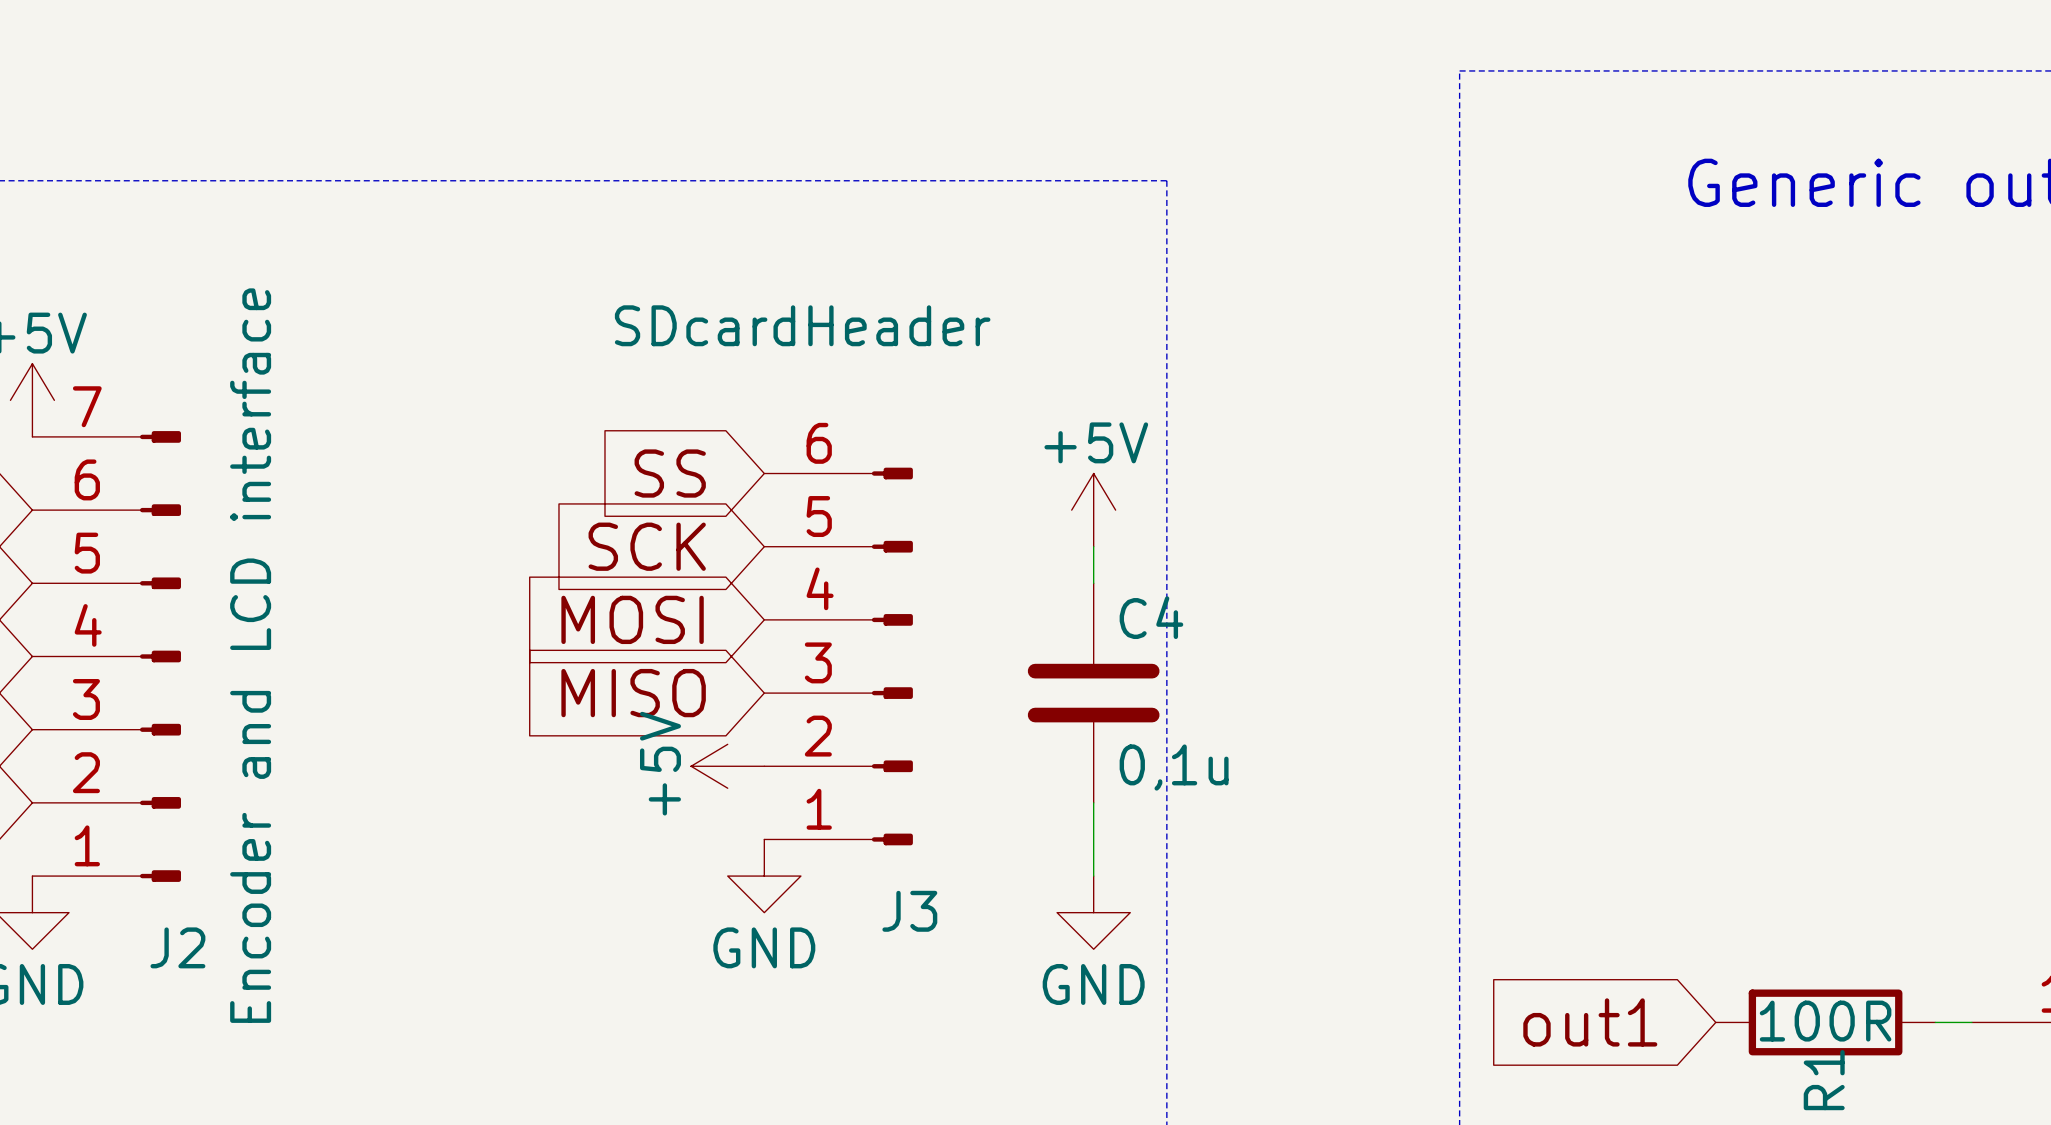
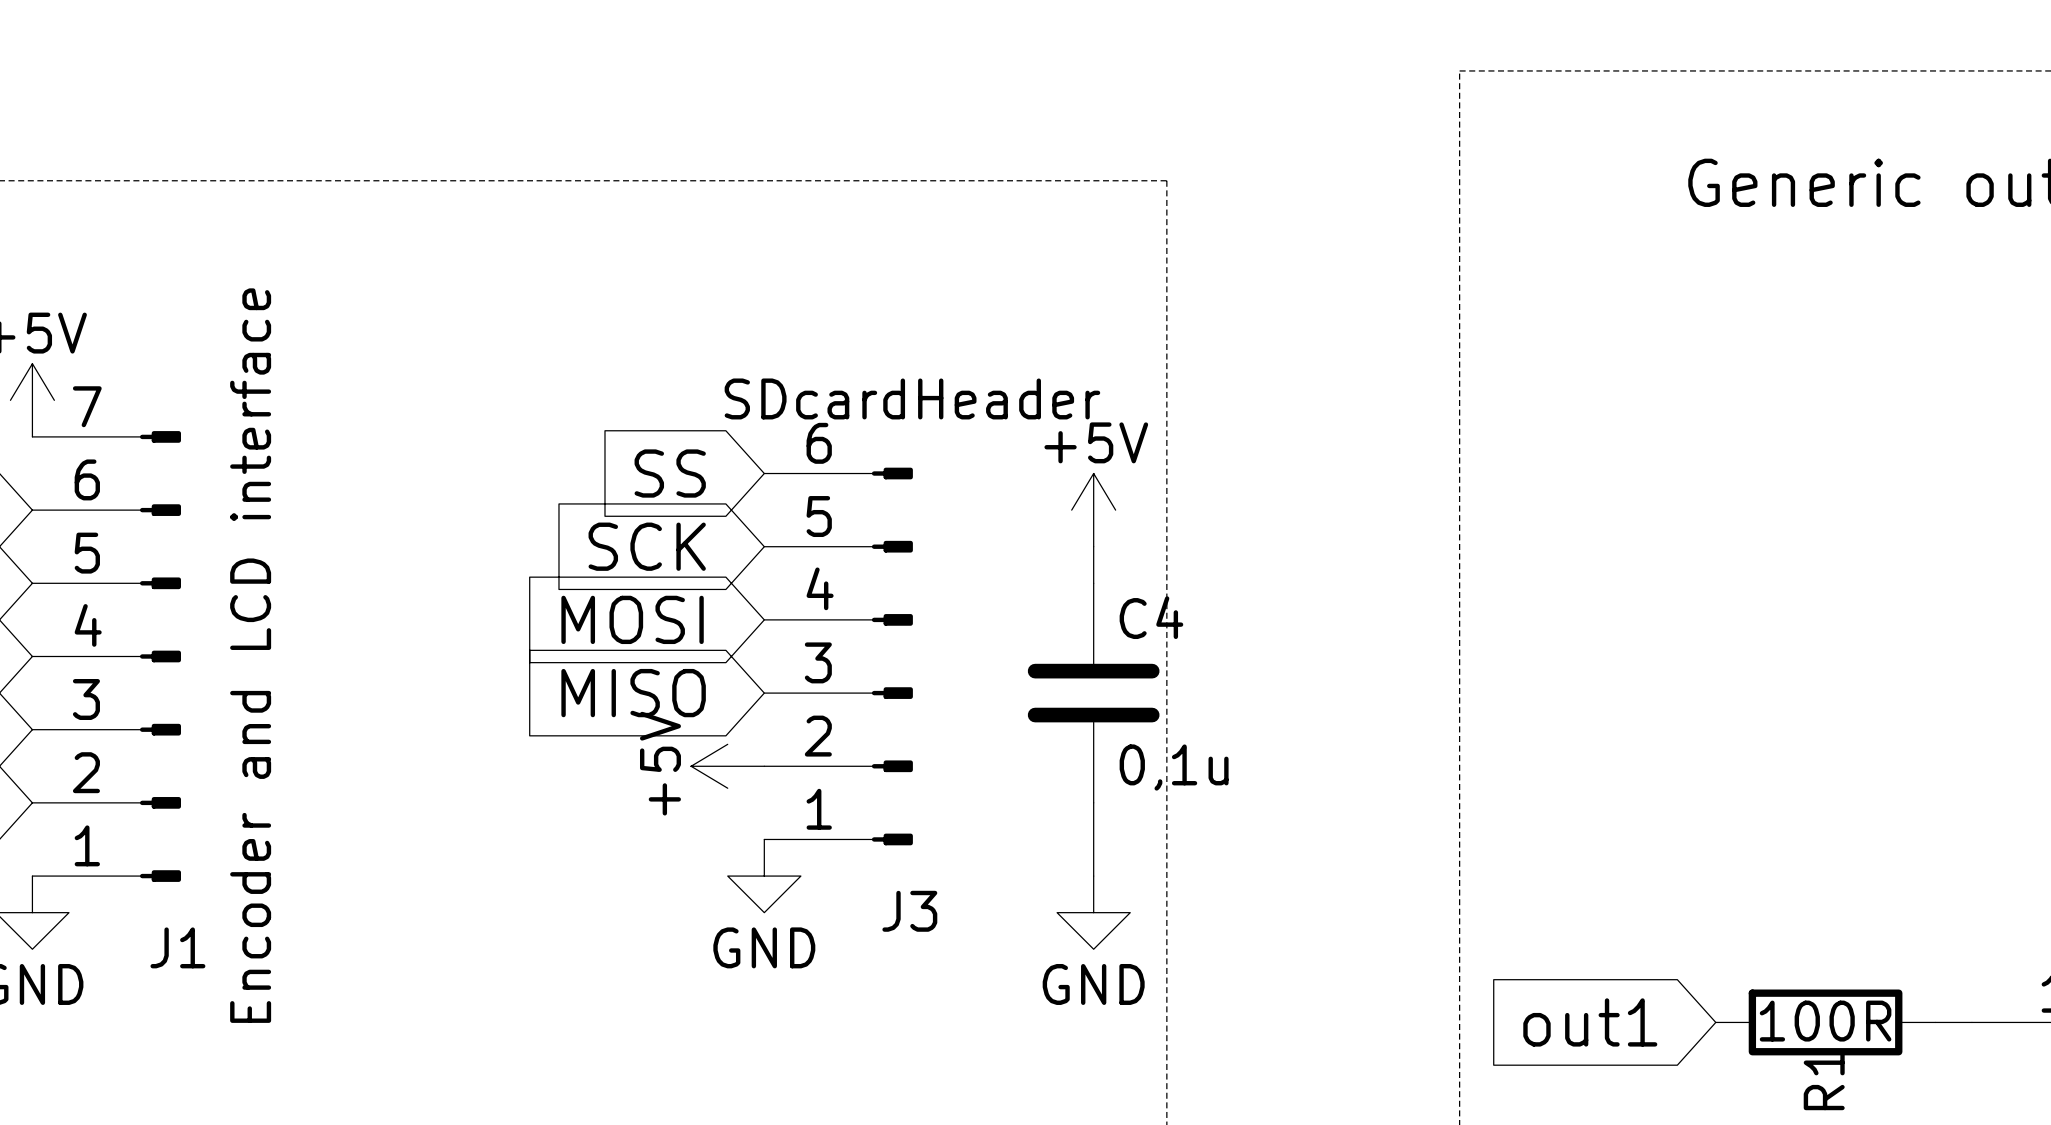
J3 value position: SDcardHeader (802, 325) -> SDcardHeader (912, 398)
J2 name: J2 (177, 947) -> J1 (177, 947)

